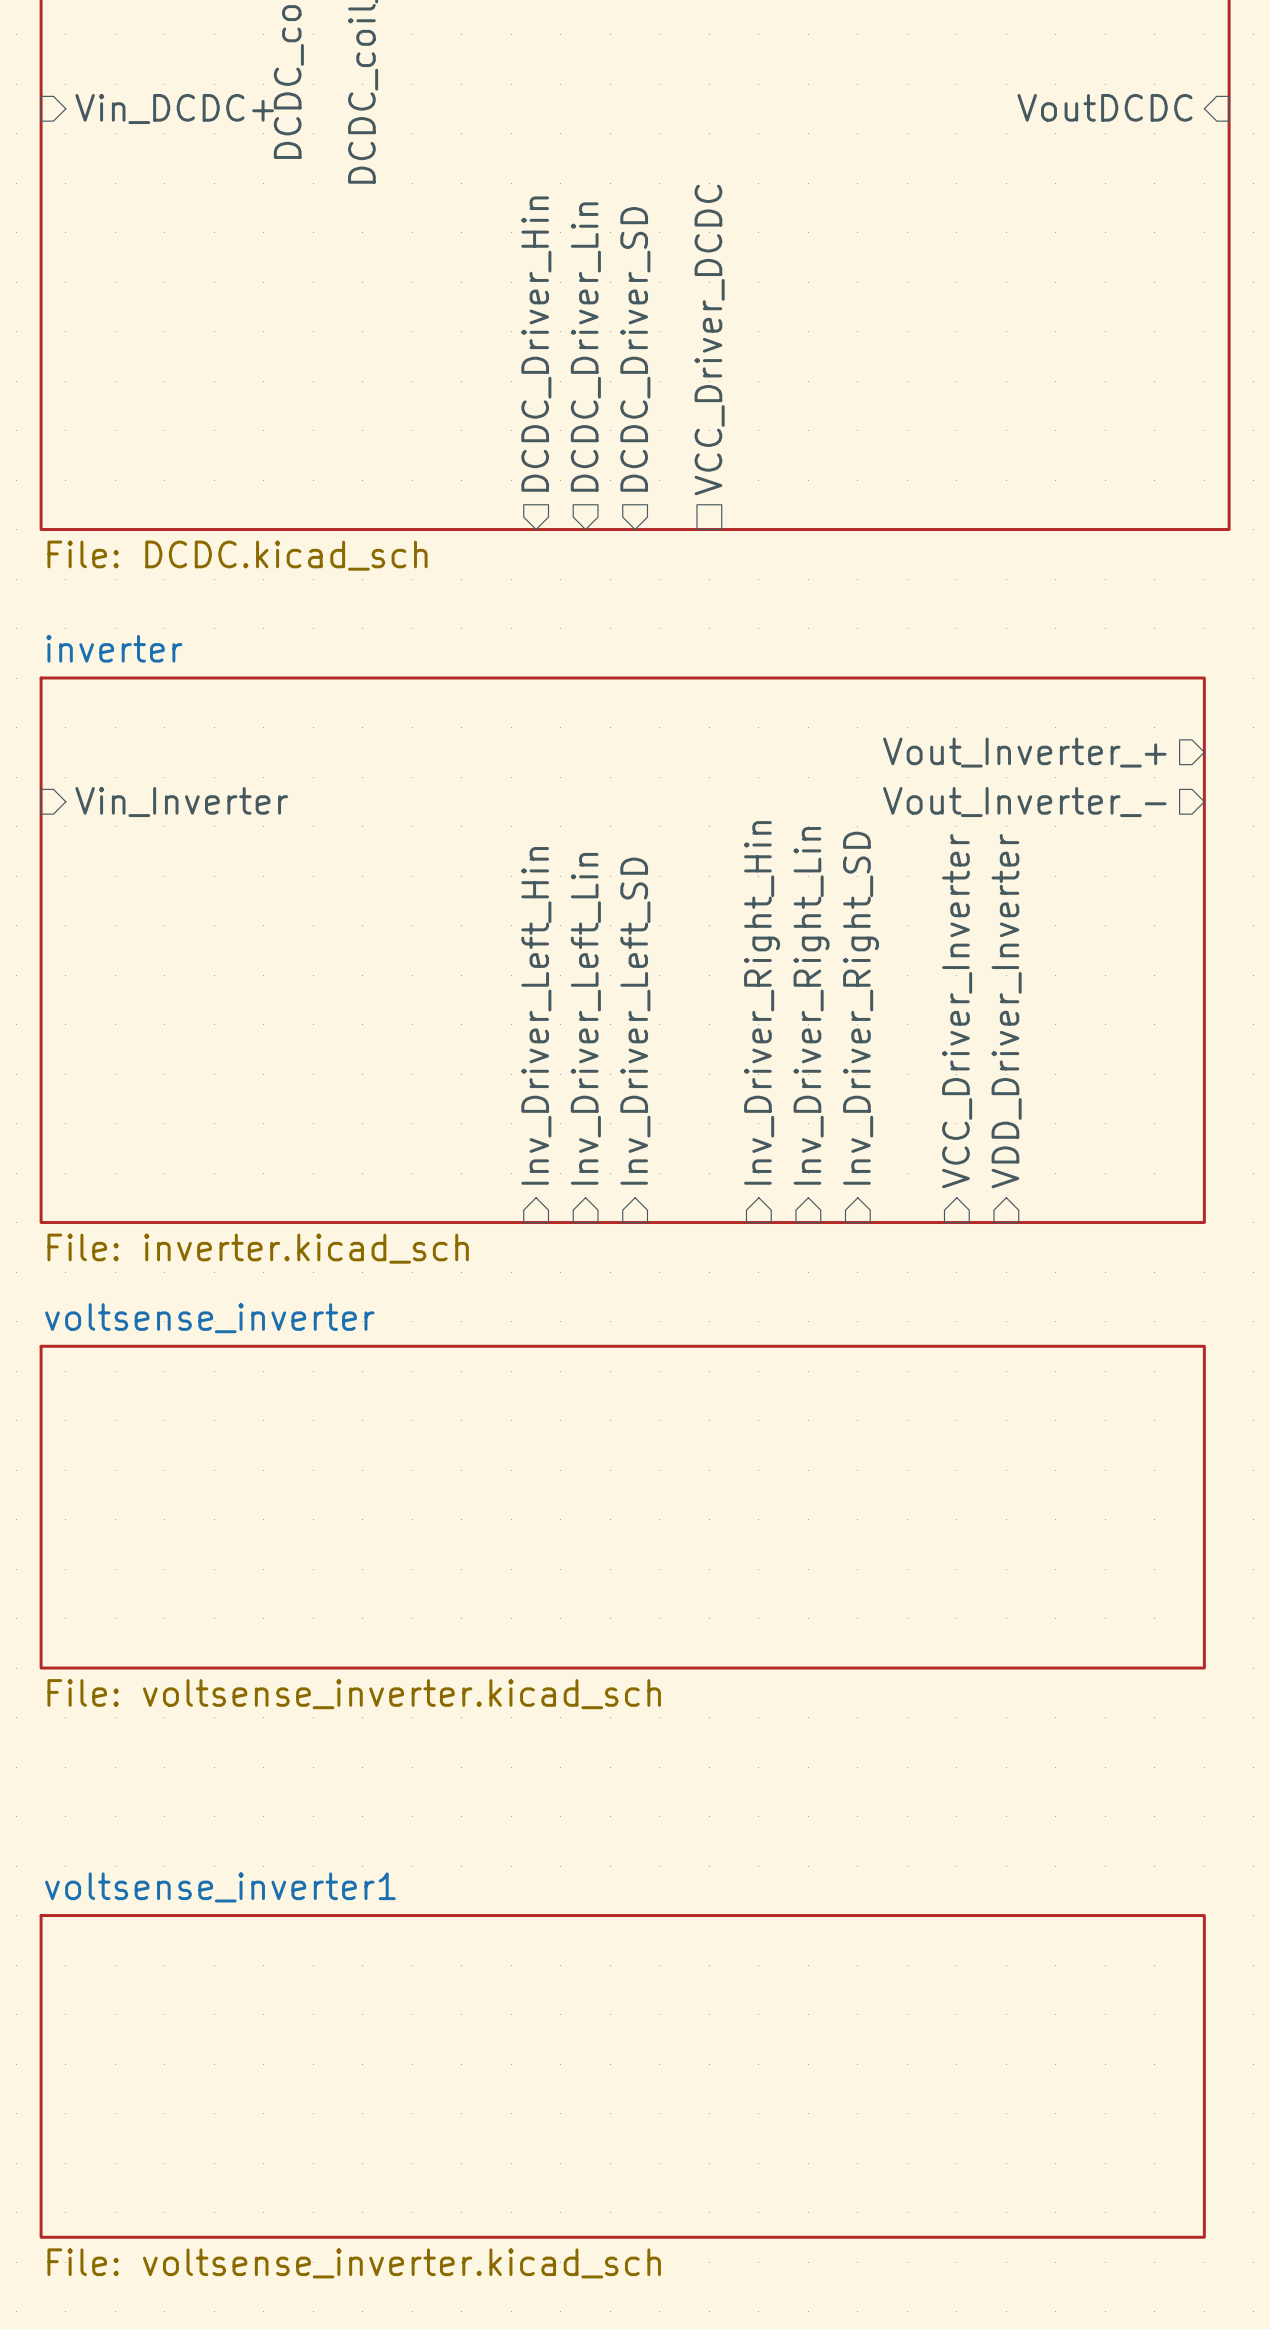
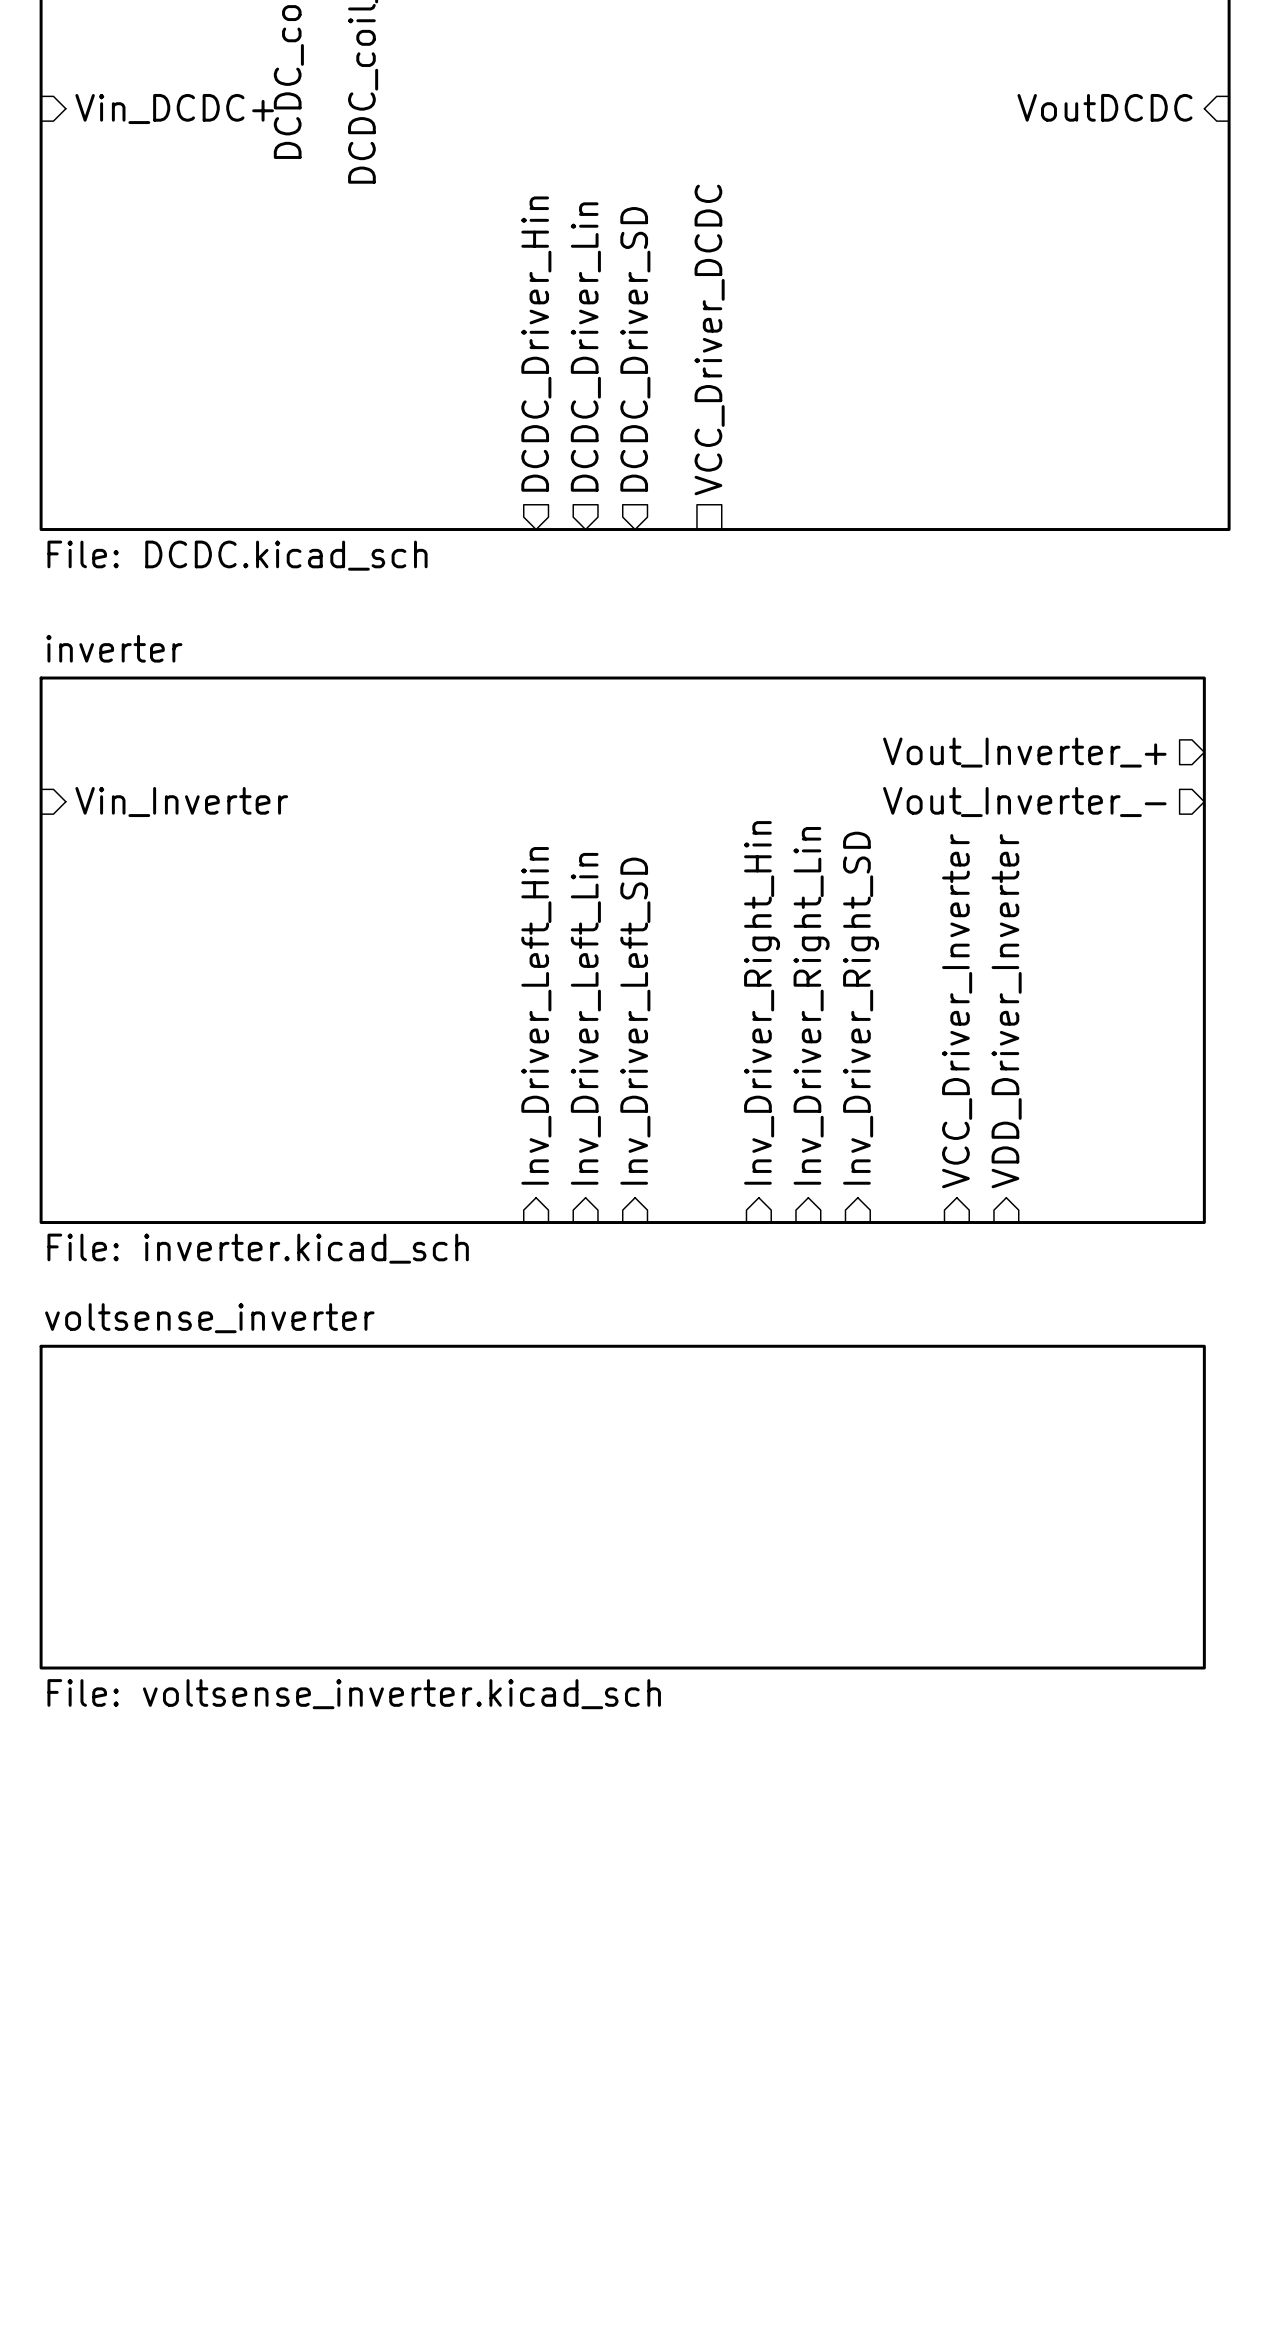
sheet voltsense_inverter1: File: voltsense_inverter.kicad_sch (622, 2076) -> none

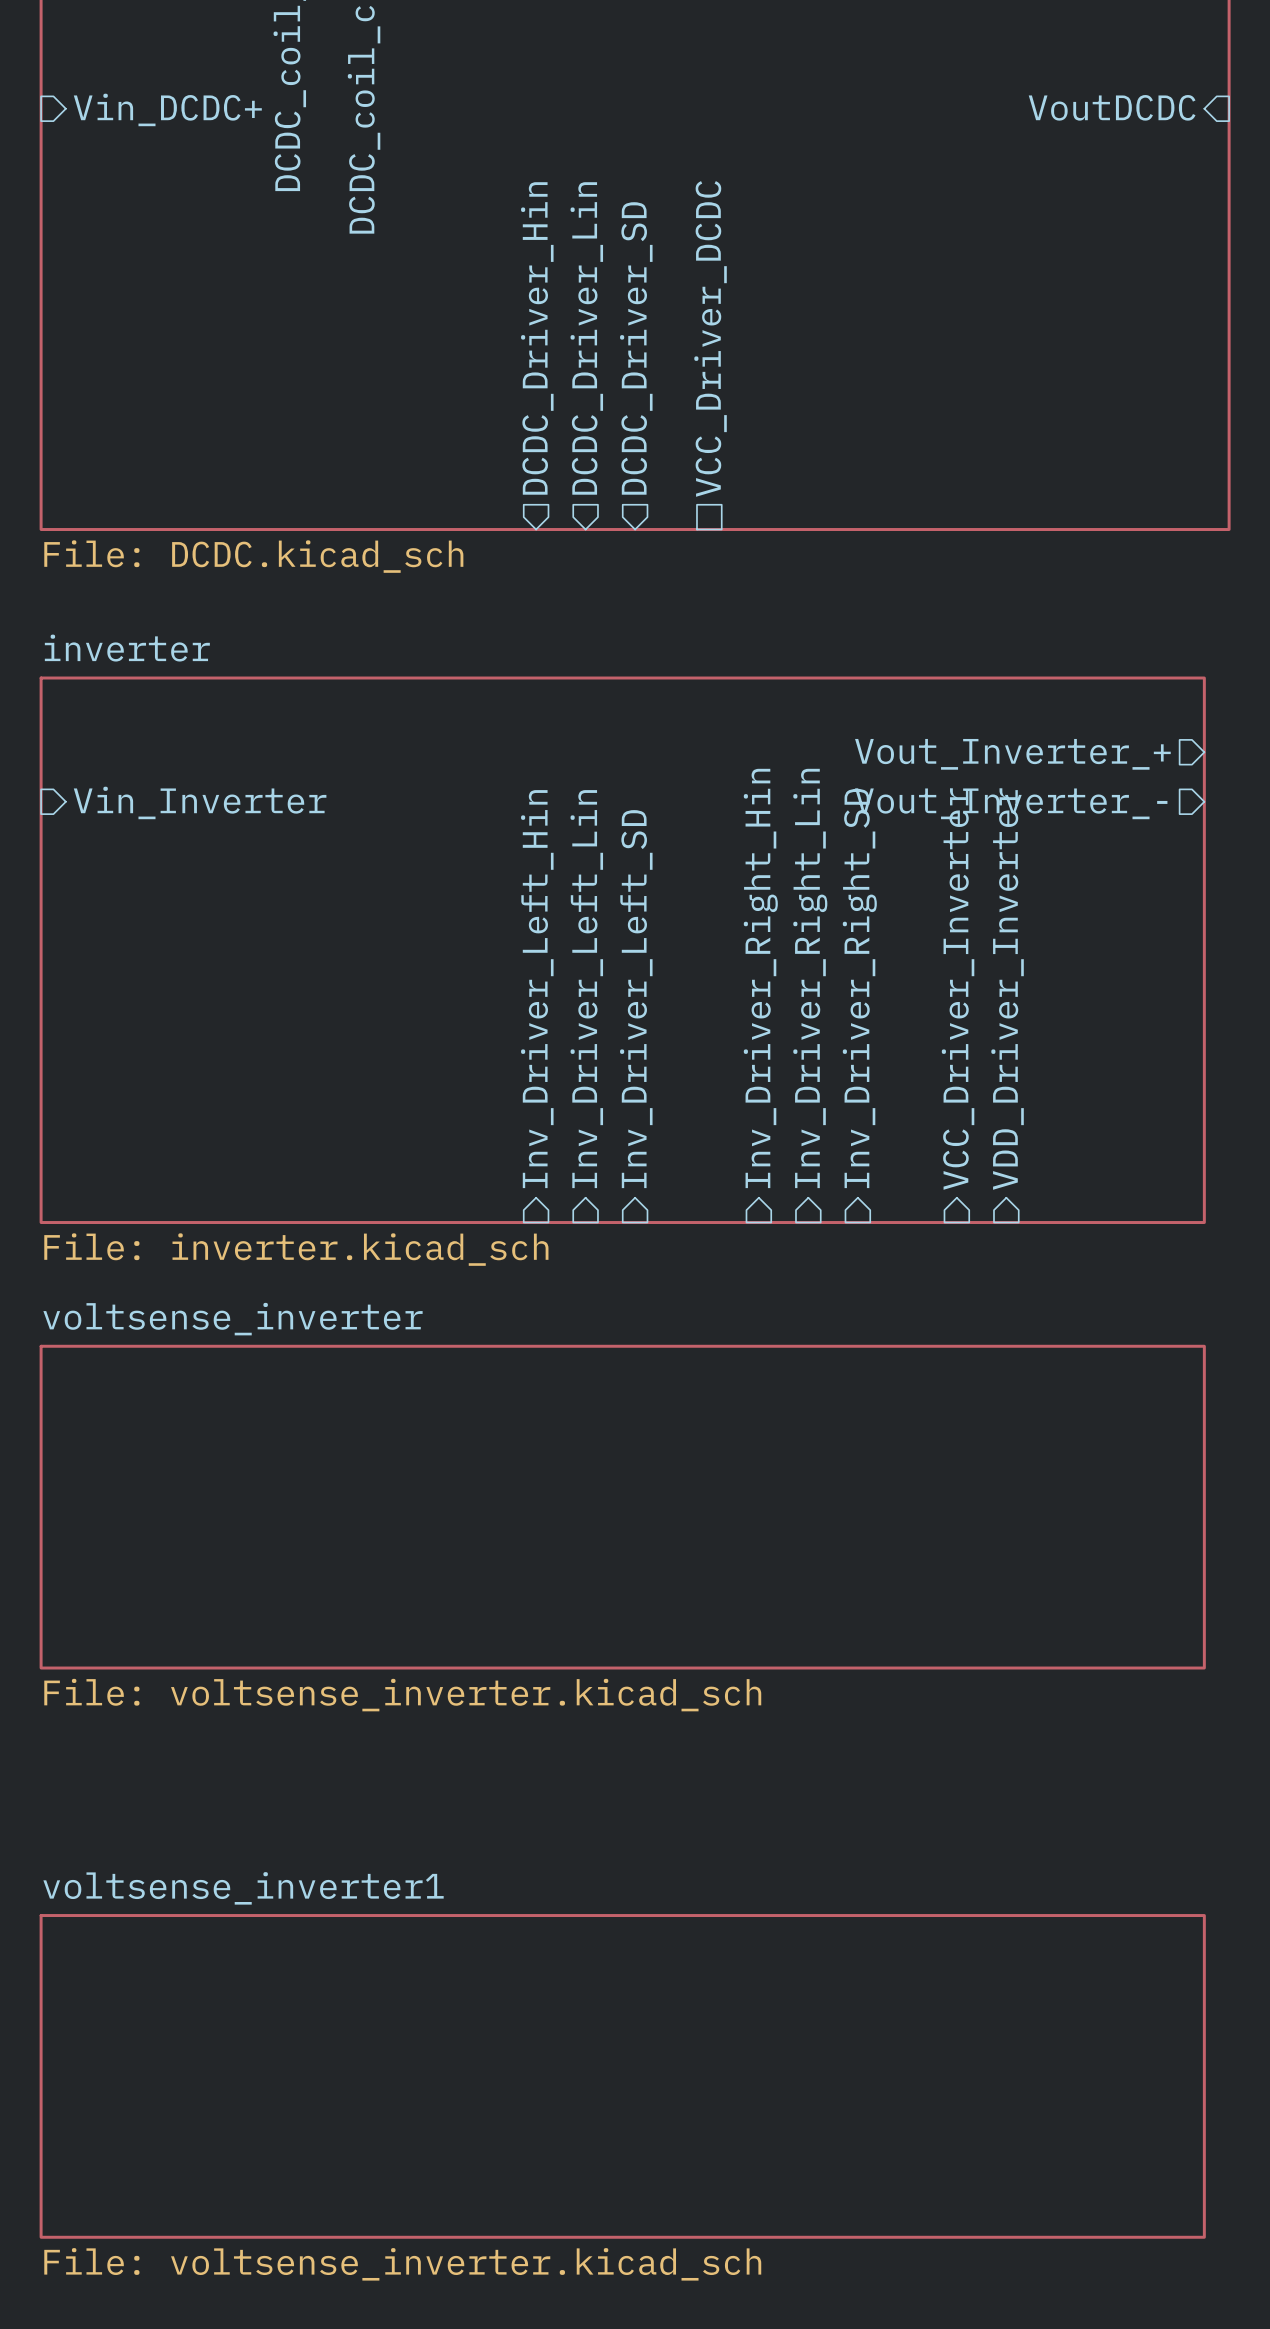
sheet voltsense_inverter1: none -> File: voltsense_inverter.kicad_sch (622, 2076)

